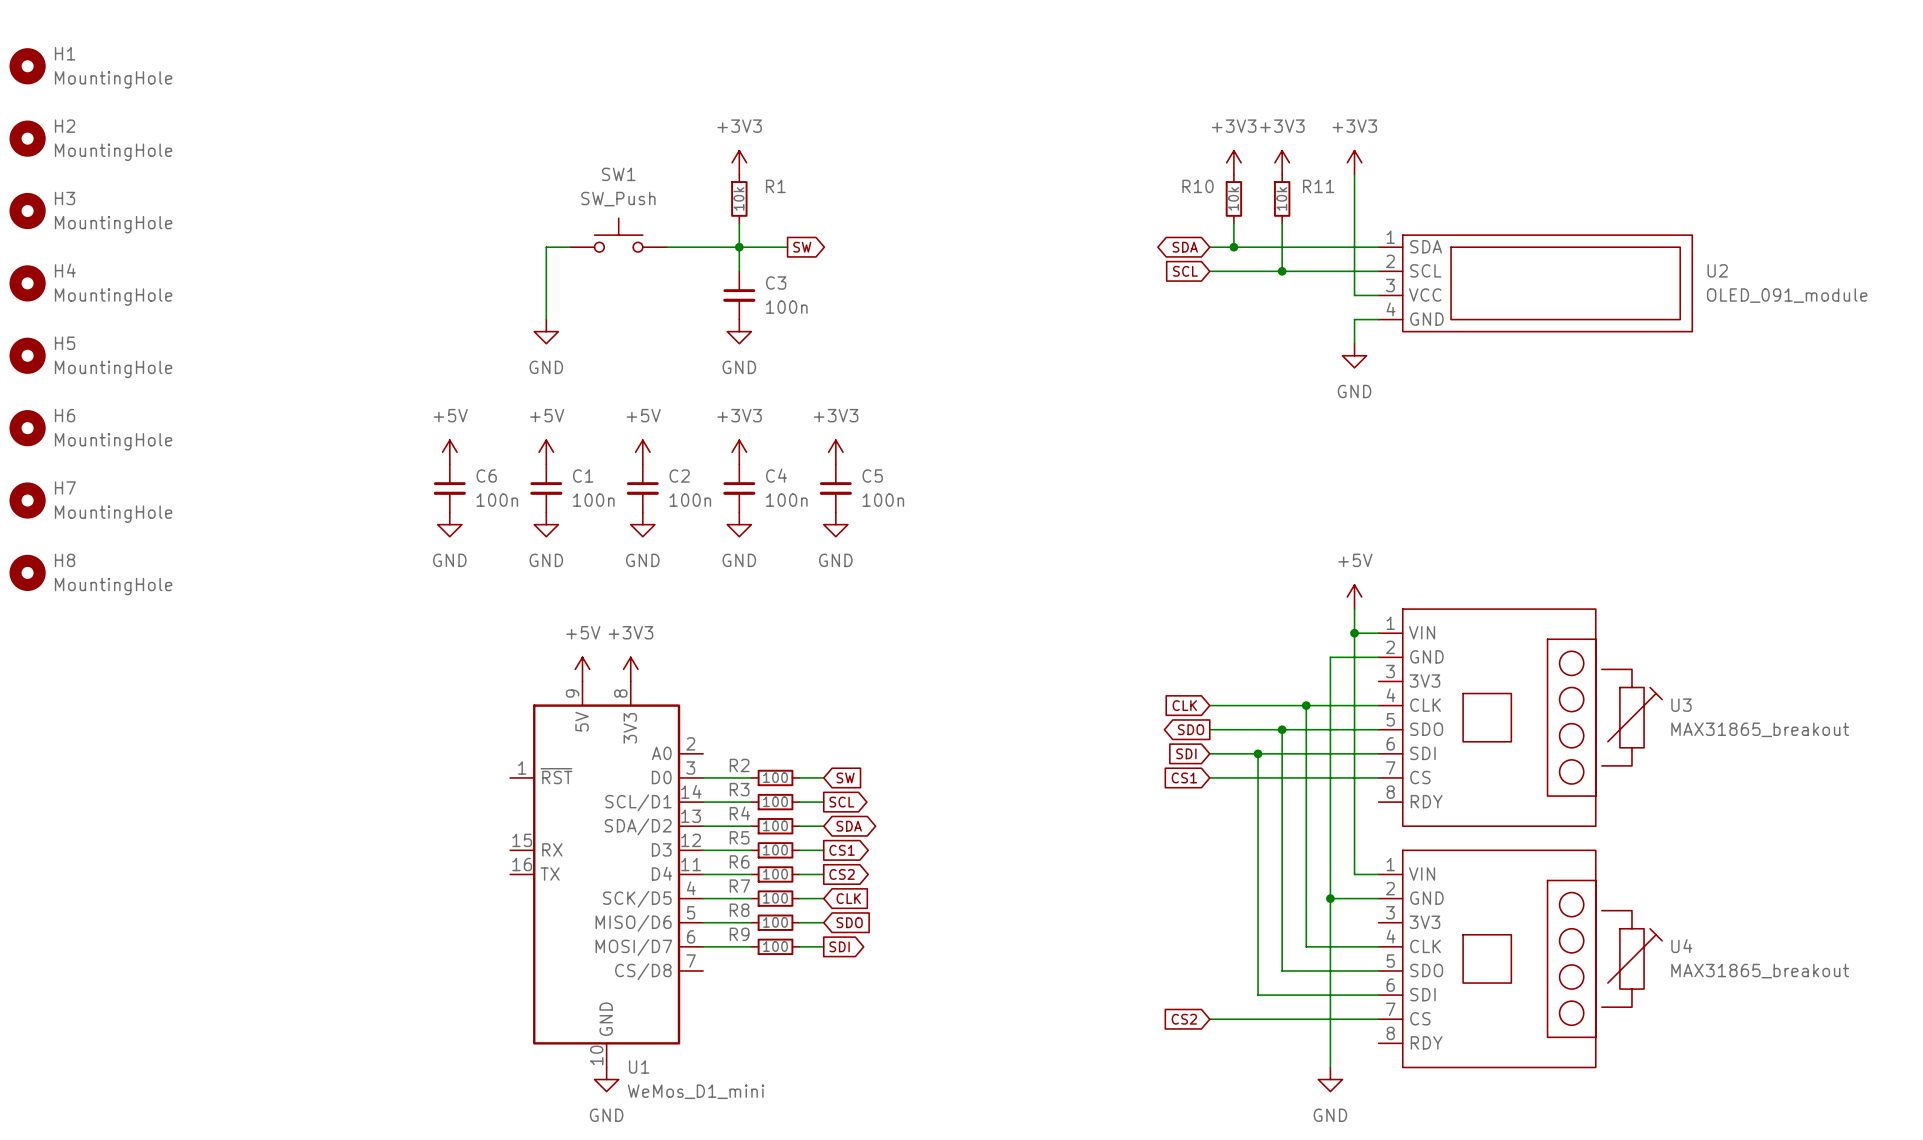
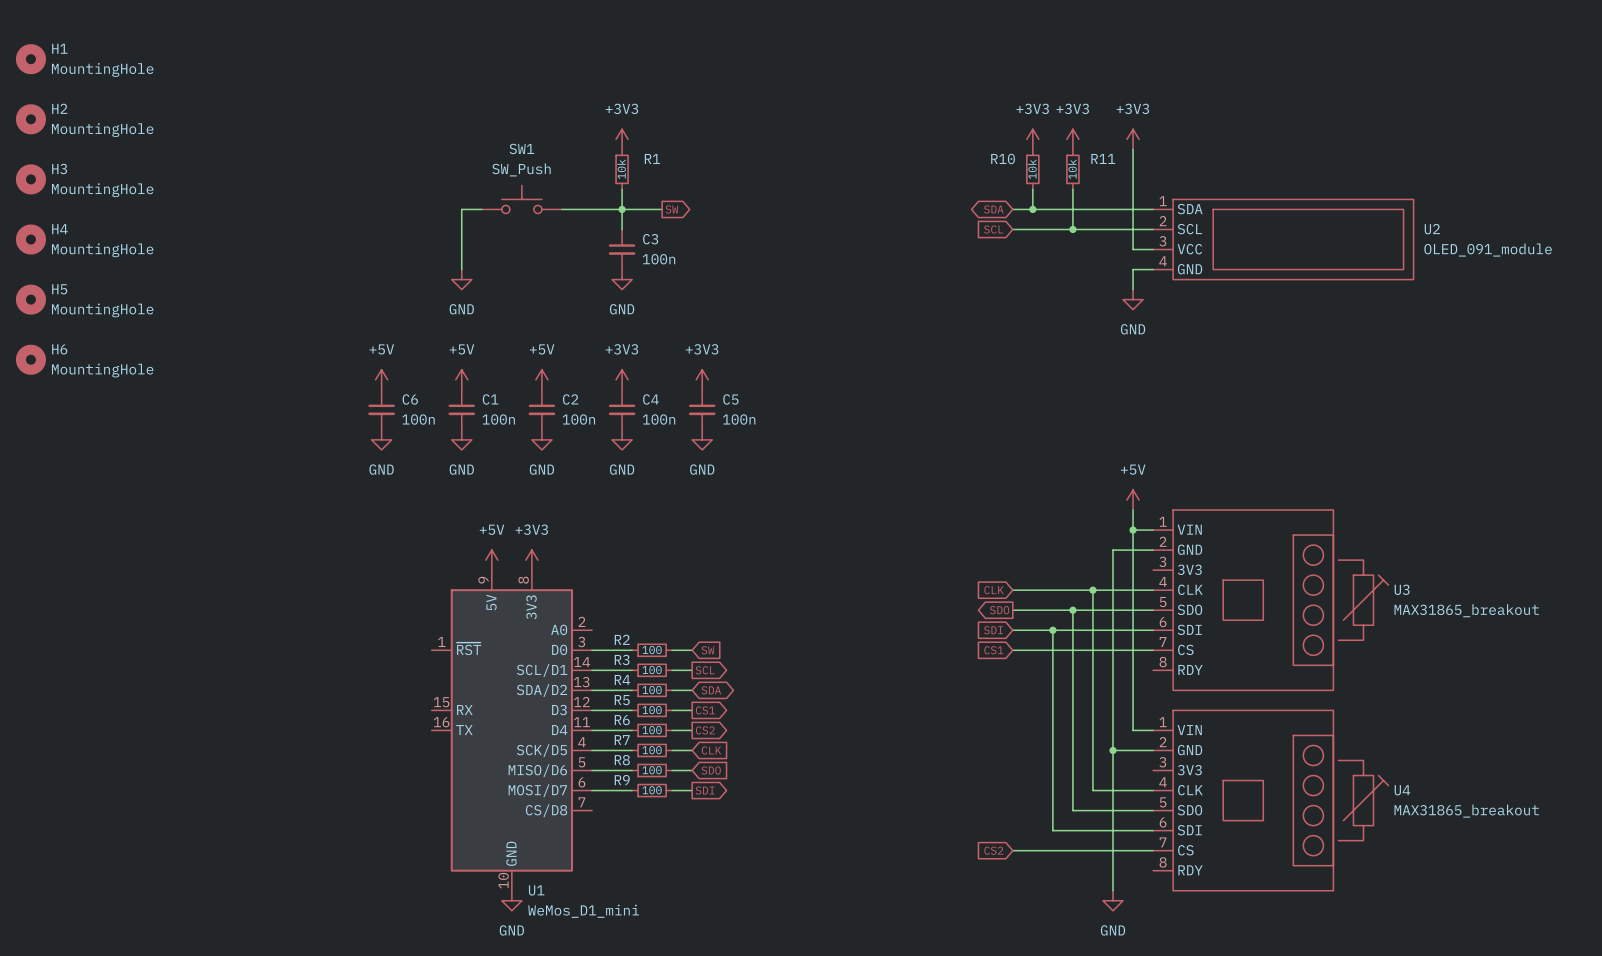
H7: MountingHole (27, 500) -> none
H8: MountingHole (27, 572) -> none

